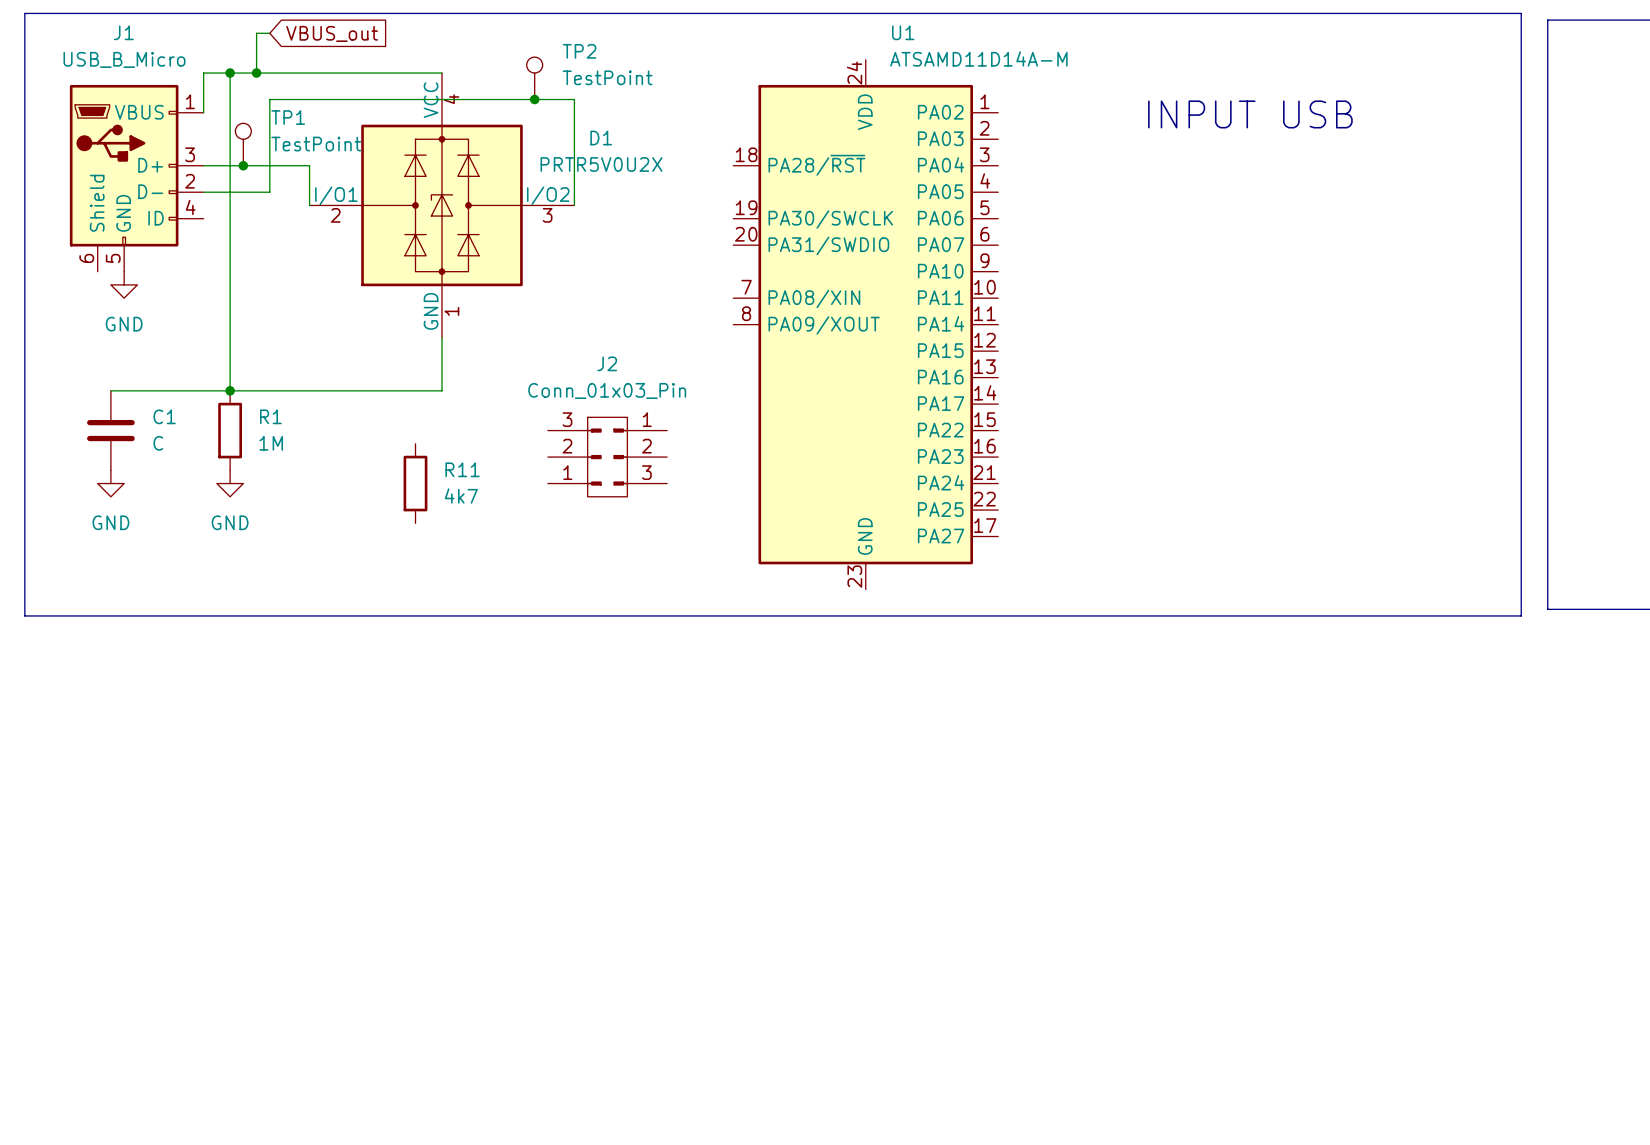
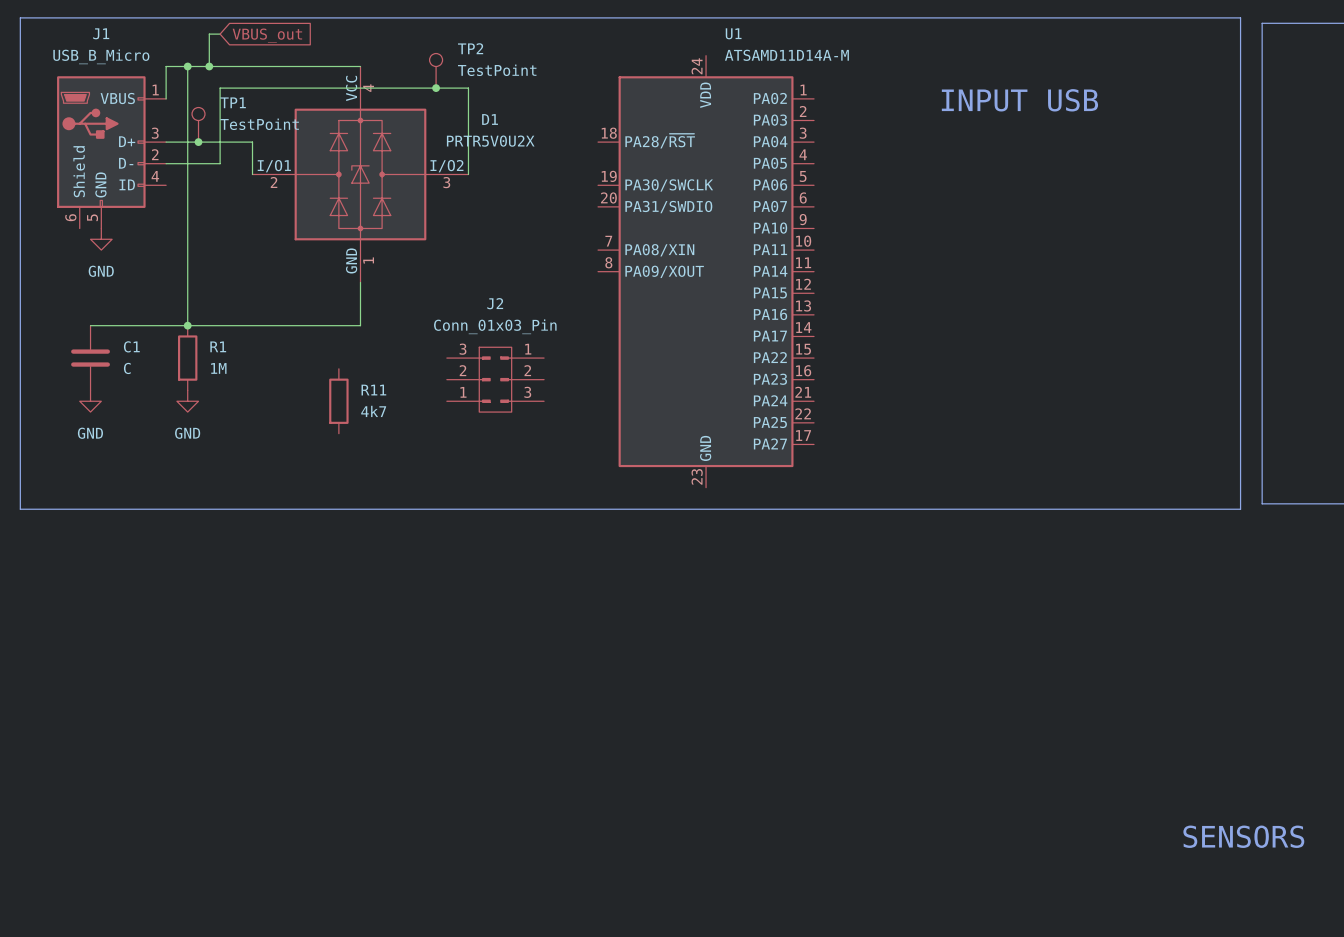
text: none -> SENSORS (1243, 836)

